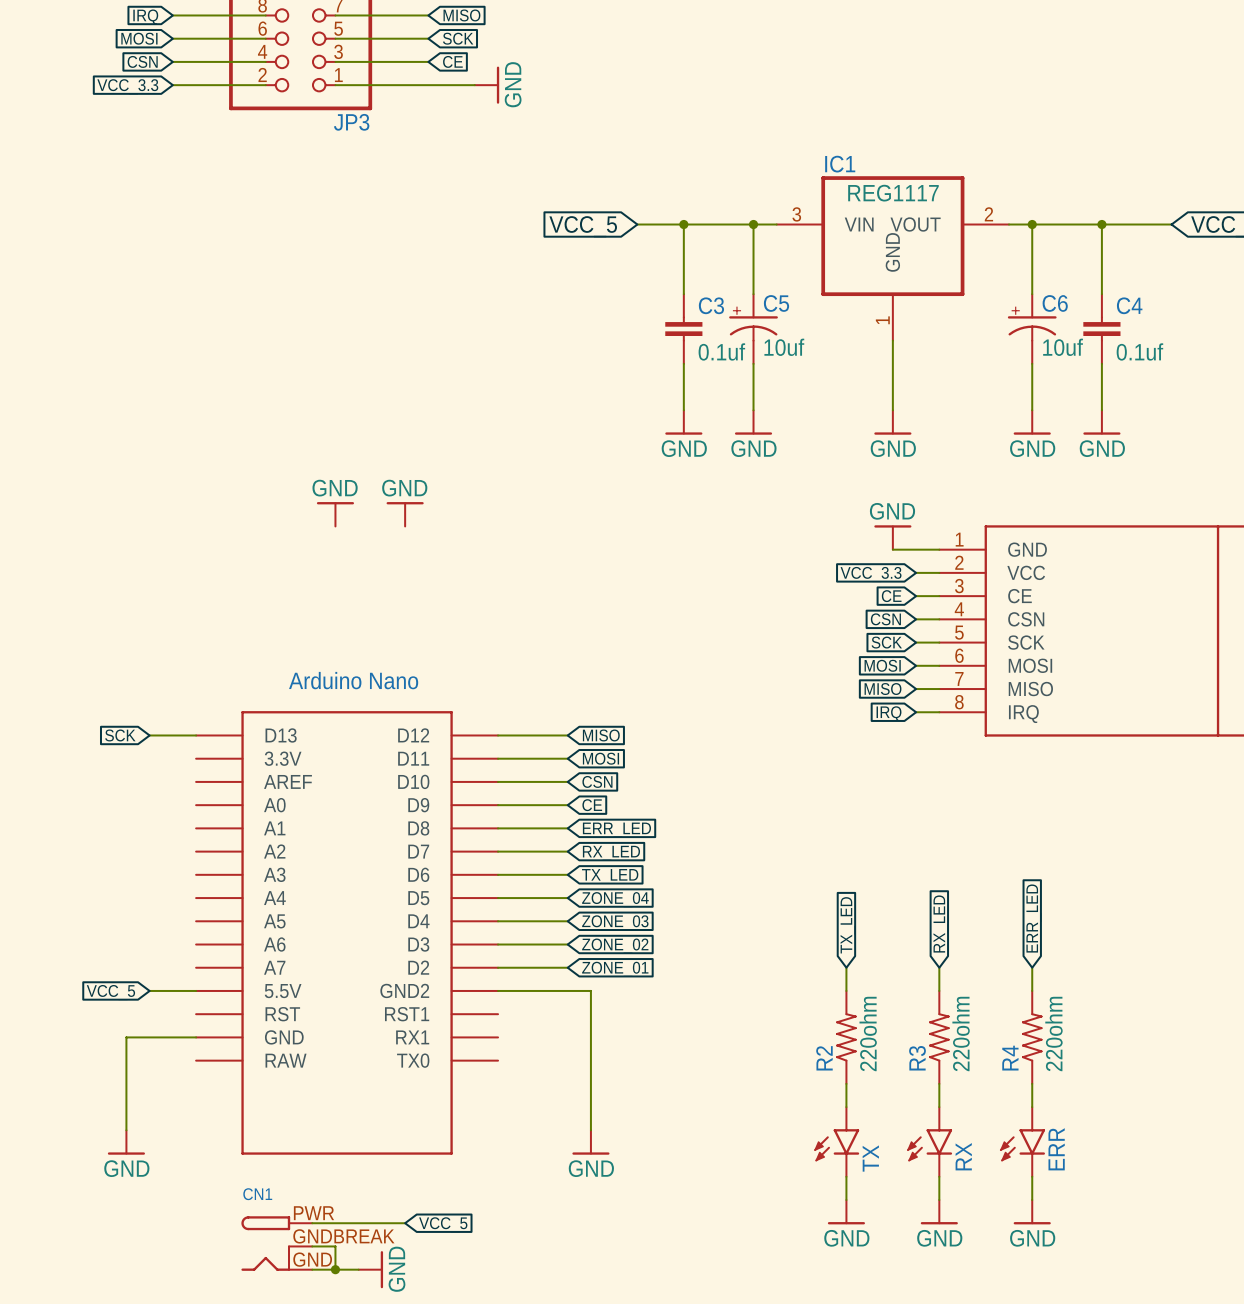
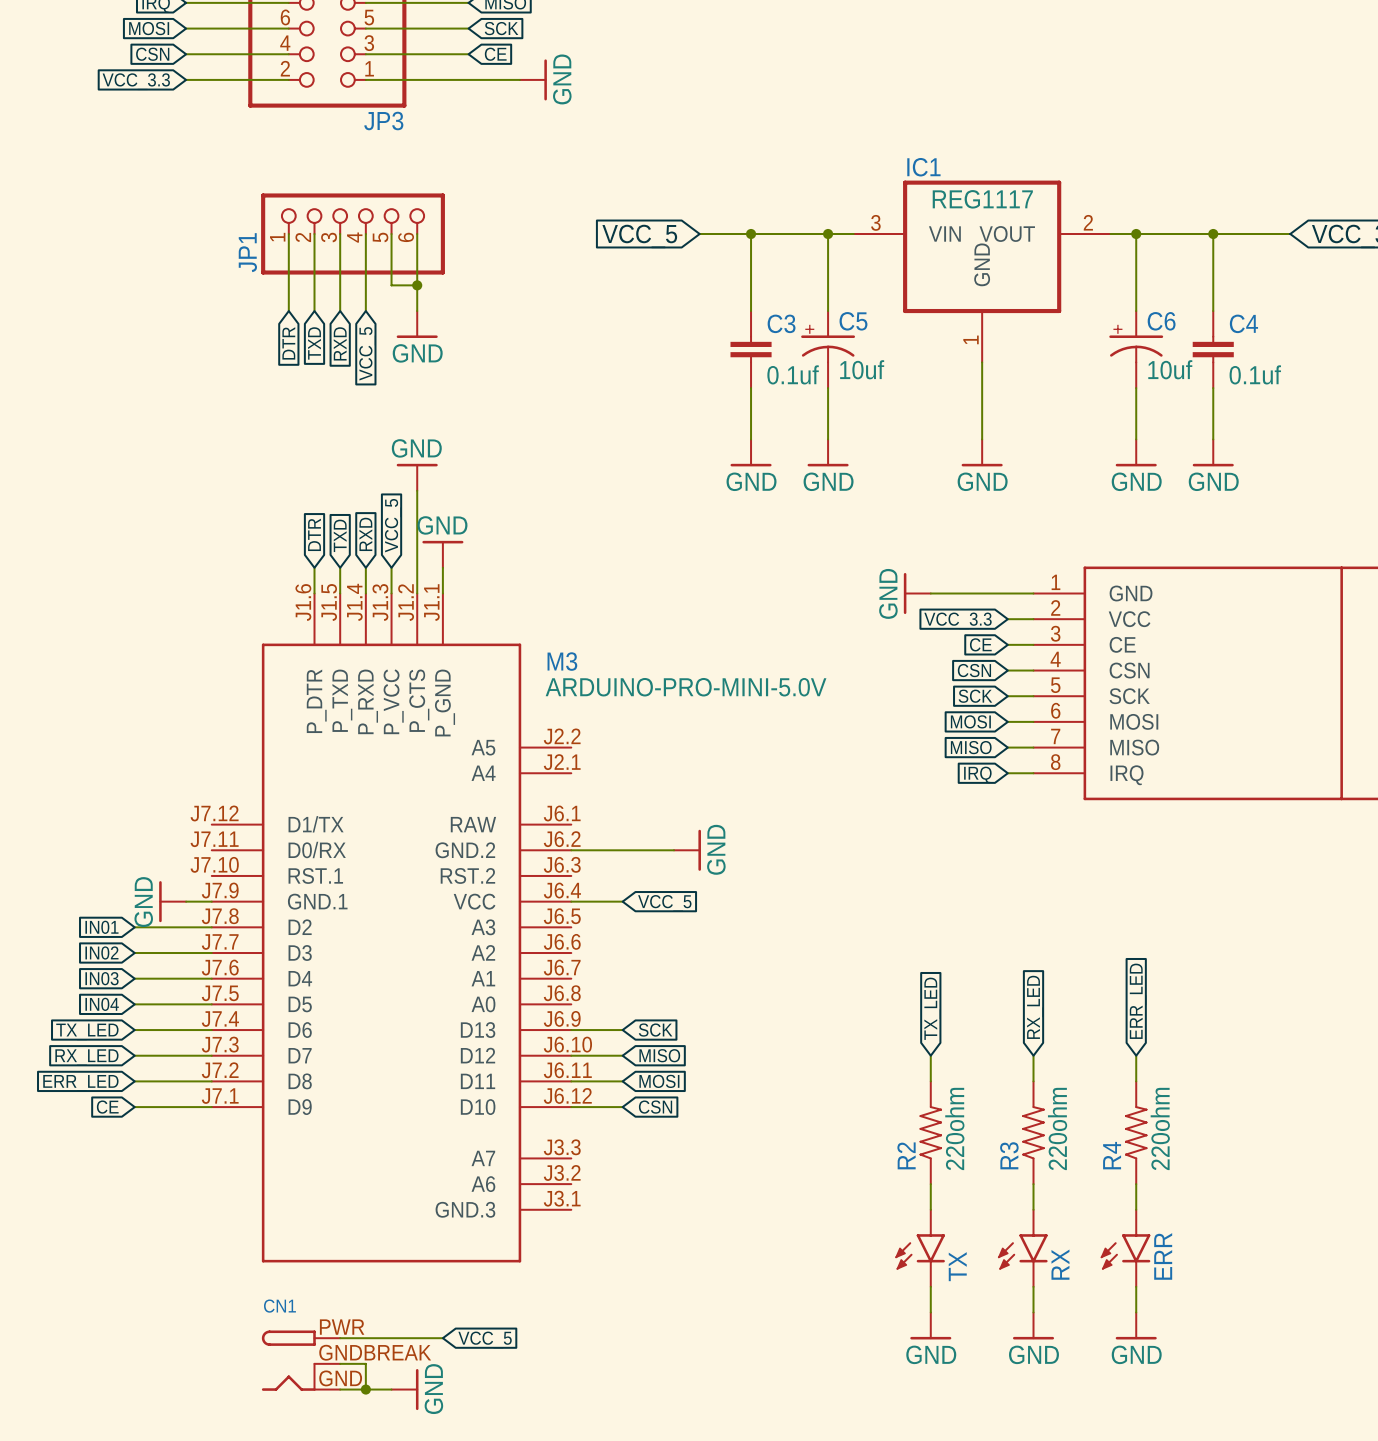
wire: none -> (288, 234) (288, 311)
wire: none -> (314, 234) (314, 311)
wire: none -> (340, 234) (340, 311)
JP1: none -> (353, 234)
wire: none -> (365, 234) (365, 311)
wire: none -> (391, 234) (391, 285) (417, 285)
wire: none -> (417, 234) (417, 311)
junction: none -> (417, 285)
power symbol: none -> GND (417, 324)
global label: none -> DTR (288, 343)
global label: none -> TXD (314, 343)
global label: none -> RXD (340, 343)
global label: none -> VCC_5 (367, 353)
wire: none -> (417, 490) (417, 593)
global label: none -> VCC_5 (393, 525)
global label: none -> DTR (314, 534)
global label: none -> RXD (365, 534)
global label: none -> TXD (340, 535)
power symbol position: GND (335, 514) -> GND (417, 477)
wire: none -> (314, 567) (314, 593)
wire: none -> (340, 567) (340, 593)
wire: none -> (365, 567) (365, 593)
wire: none -> (391, 567) (391, 593)
wire: none -> (442, 567) (442, 593)
power symbol rotation: 0° (892, 526) -> 90° counterclockwise (905, 593)
power symbol position: GND (892, 537) -> GND (917, 593)
wire: none -> (930, 593) (982, 593)
global label: SCK (120, 735) -> none
wire: (149, 735) (196, 735) -> none
wire: (498, 735) (567, 735) -> none
global label: MISO (601, 735) -> none
wire: (498, 758) (567, 758) -> none
global label: MOSI (600, 758) -> none
wire: none -> (622, 850) (674, 850)
global label: CSN (597, 781) -> none
power symbol: none -> GND (687, 850)
wire: (498, 805) (567, 805) -> none
global label: CE (592, 805) -> none
power symbol: none -> GND (172, 901)
wire: none -> (186, 901) (211, 901)
global label: ERR_LED (616, 830) -> VCC_5 (664, 903)
global label: none -> IN01 (101, 927)
wire: none -> (134, 927) (211, 927)
wire: (498, 851) (567, 851) -> none
M3: none -> ARDUINO-PRO-MINI-5.0V (391, 927)
global label: RX_LED (611, 853) -> none
global label: none -> IN02 (101, 953)
wire: none -> (134, 953) (211, 953)
wire: (498, 874) (567, 874) -> none
global label: TX_LED (610, 876) -> none
global label: none -> IN03 (102, 978)
wire: none -> (134, 978) (211, 978)
wire: (498, 898) (567, 898) -> none
global label: ZONE_04 (615, 899) -> none
global label: none -> IN04 (102, 1004)
wire: none -> (134, 1004) (211, 1004)
wire: (498, 921) (567, 921) -> none
global label: ZONE_03 (615, 922) -> none
part: (347, 932) -> none
wire: none -> (134, 1030) (211, 1030)
global label: none -> TX_LED (87, 1031)
global label: ZONE_02 (615, 946) -> SCK (655, 1030)
wire: none -> (134, 1055) (211, 1055)
global label: none -> RX_LED (86, 1057)
global label: ZONE_01 (615, 969) -> MISO (659, 1055)
wire: none -> (134, 1081) (160, 1081)
wire: (567, 990) (590, 990) (590, 1130) -> none
global label: none -> MOSI (659, 1081)
global label: none -> ERR_LED (80, 1083)
global label: VCC_5 (110, 992) -> none
global label: none -> CE (107, 1107)
wire: none -> (134, 1107) (211, 1107)
wire: none -> (571, 1107) (622, 1107)
global label: none -> CSN (655, 1107)
wire: (196, 1037) (126, 1037) (126, 1130) -> none
power symbol: GND (126, 1142) -> none
power symbol: GND (590, 1142) -> none

